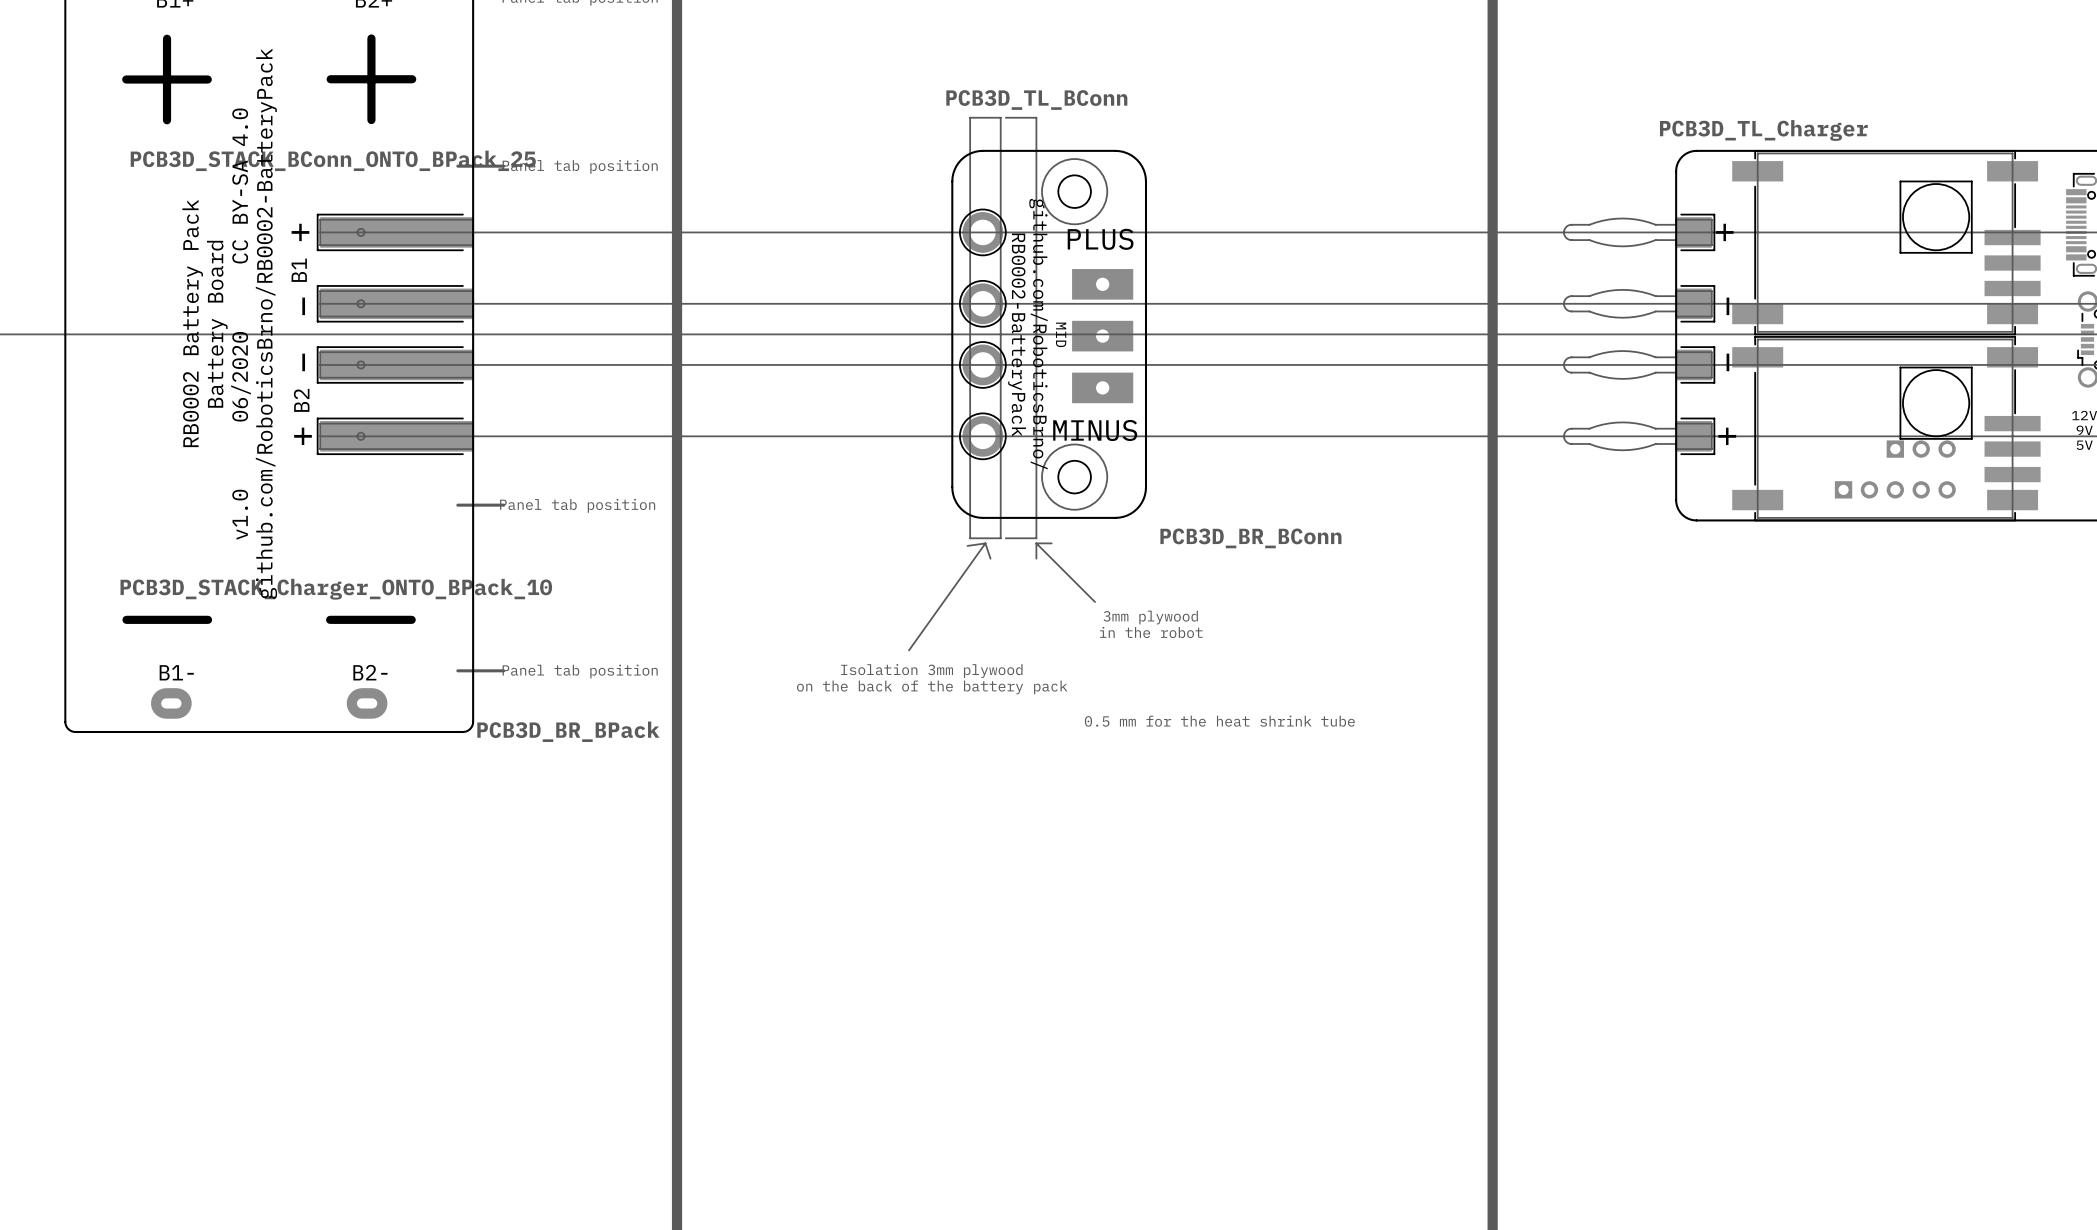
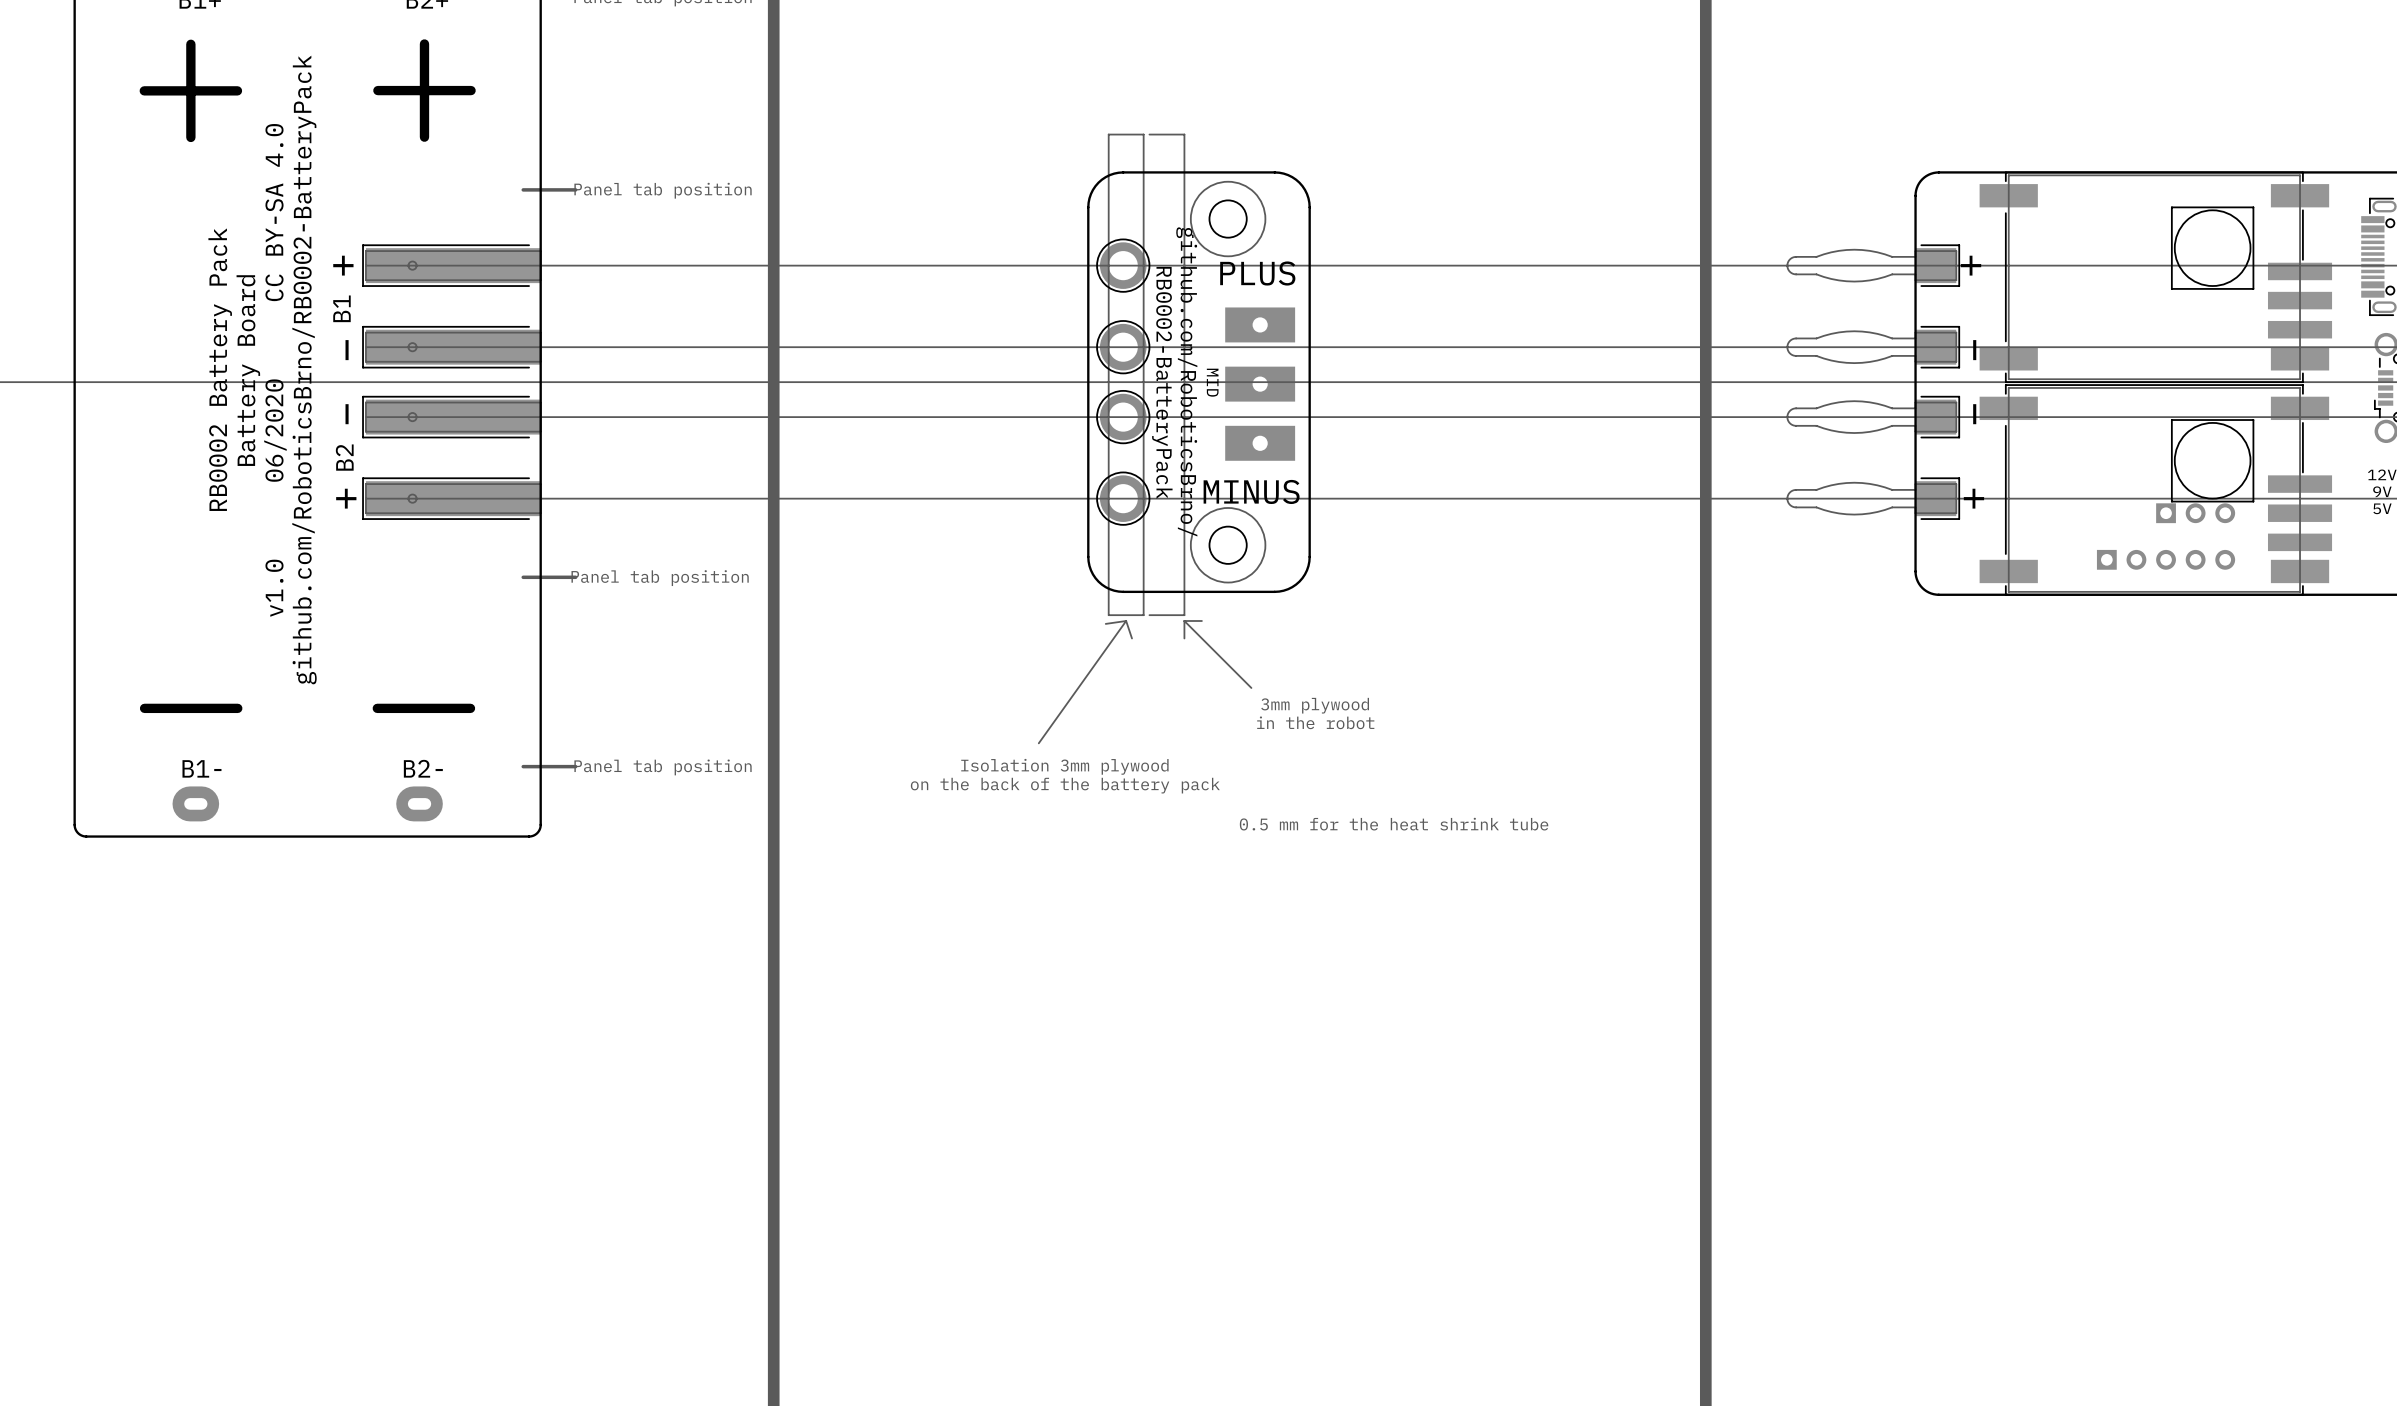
text: PCB3D_TL_BConn (1036, 100) -> none
text: PCB3D_TL_Charger (1763, 130) -> none
text: PCB3D_STACK_BConn_ONTO_BPack_25 (333, 160) -> none
text: PCB3D_BR_BConn (1250, 538) -> none
text: PCB3D_STACK_Charger_ONTO_BPack_10 (336, 589) -> none
text: PCB3D_BR_BPack (568, 731) -> none

